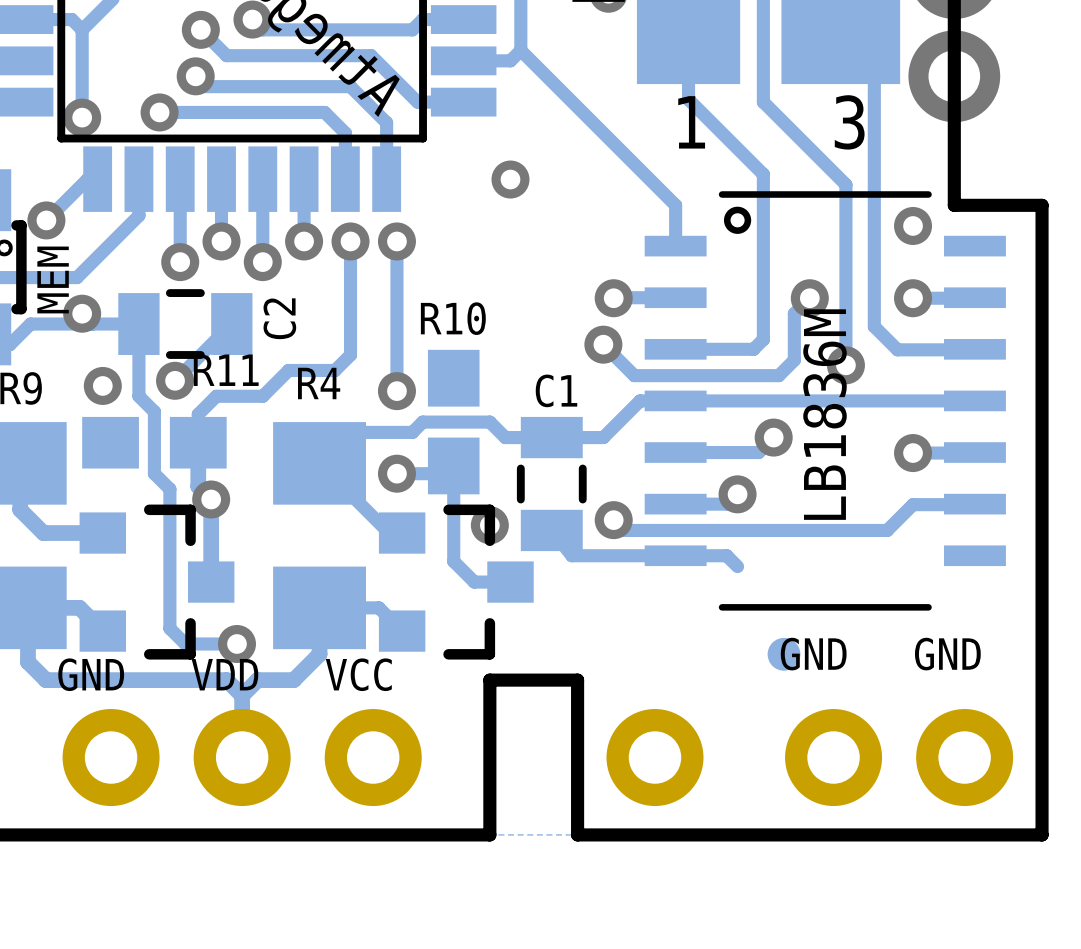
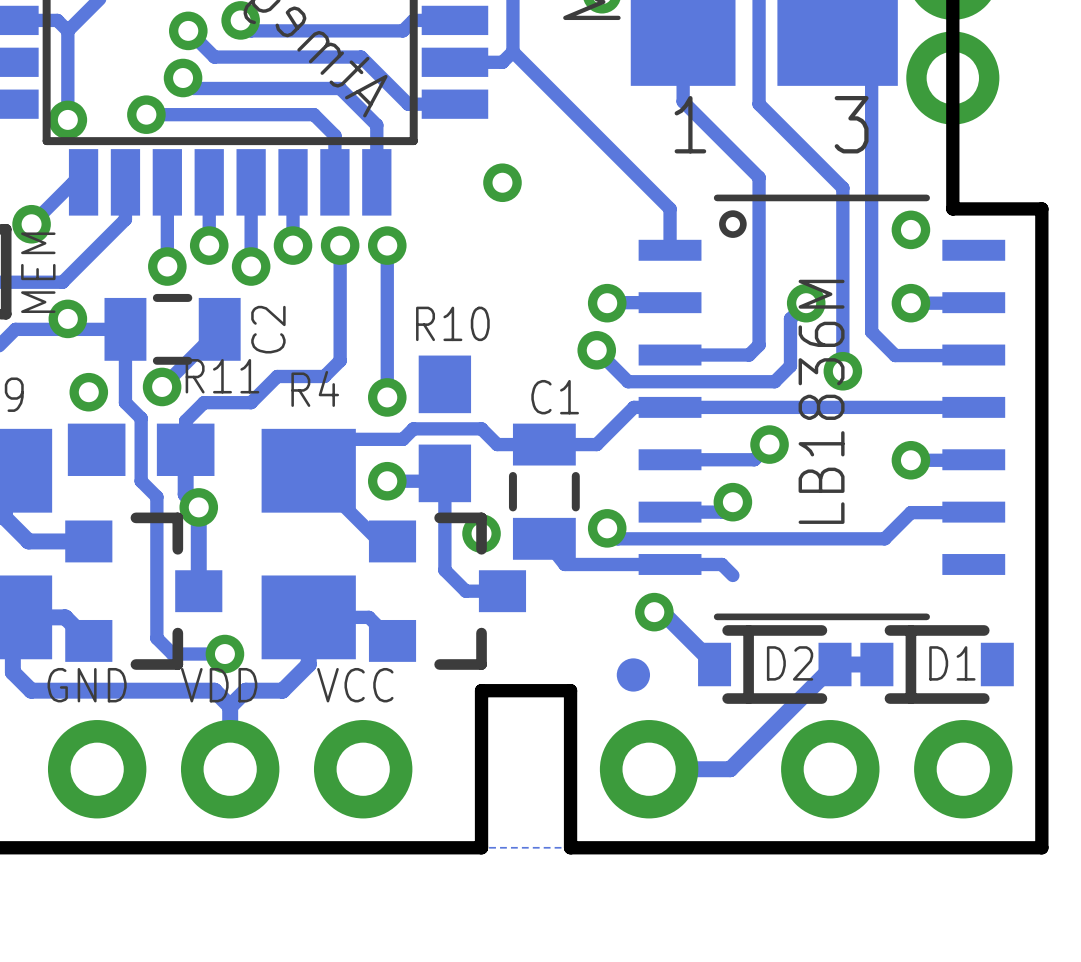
track: none -> (654, 612) (662, 612) (714, 664)
via: none -> (654, 612)
D2: none -> (774, 664)
part position: (784, 654) -> (633, 674)
text: GND (813, 654) -> none
track: none -> (876, 664) (835, 664) (730, 769) (649, 769)
D1: none -> (937, 664)
text: GND (947, 654) -> none

